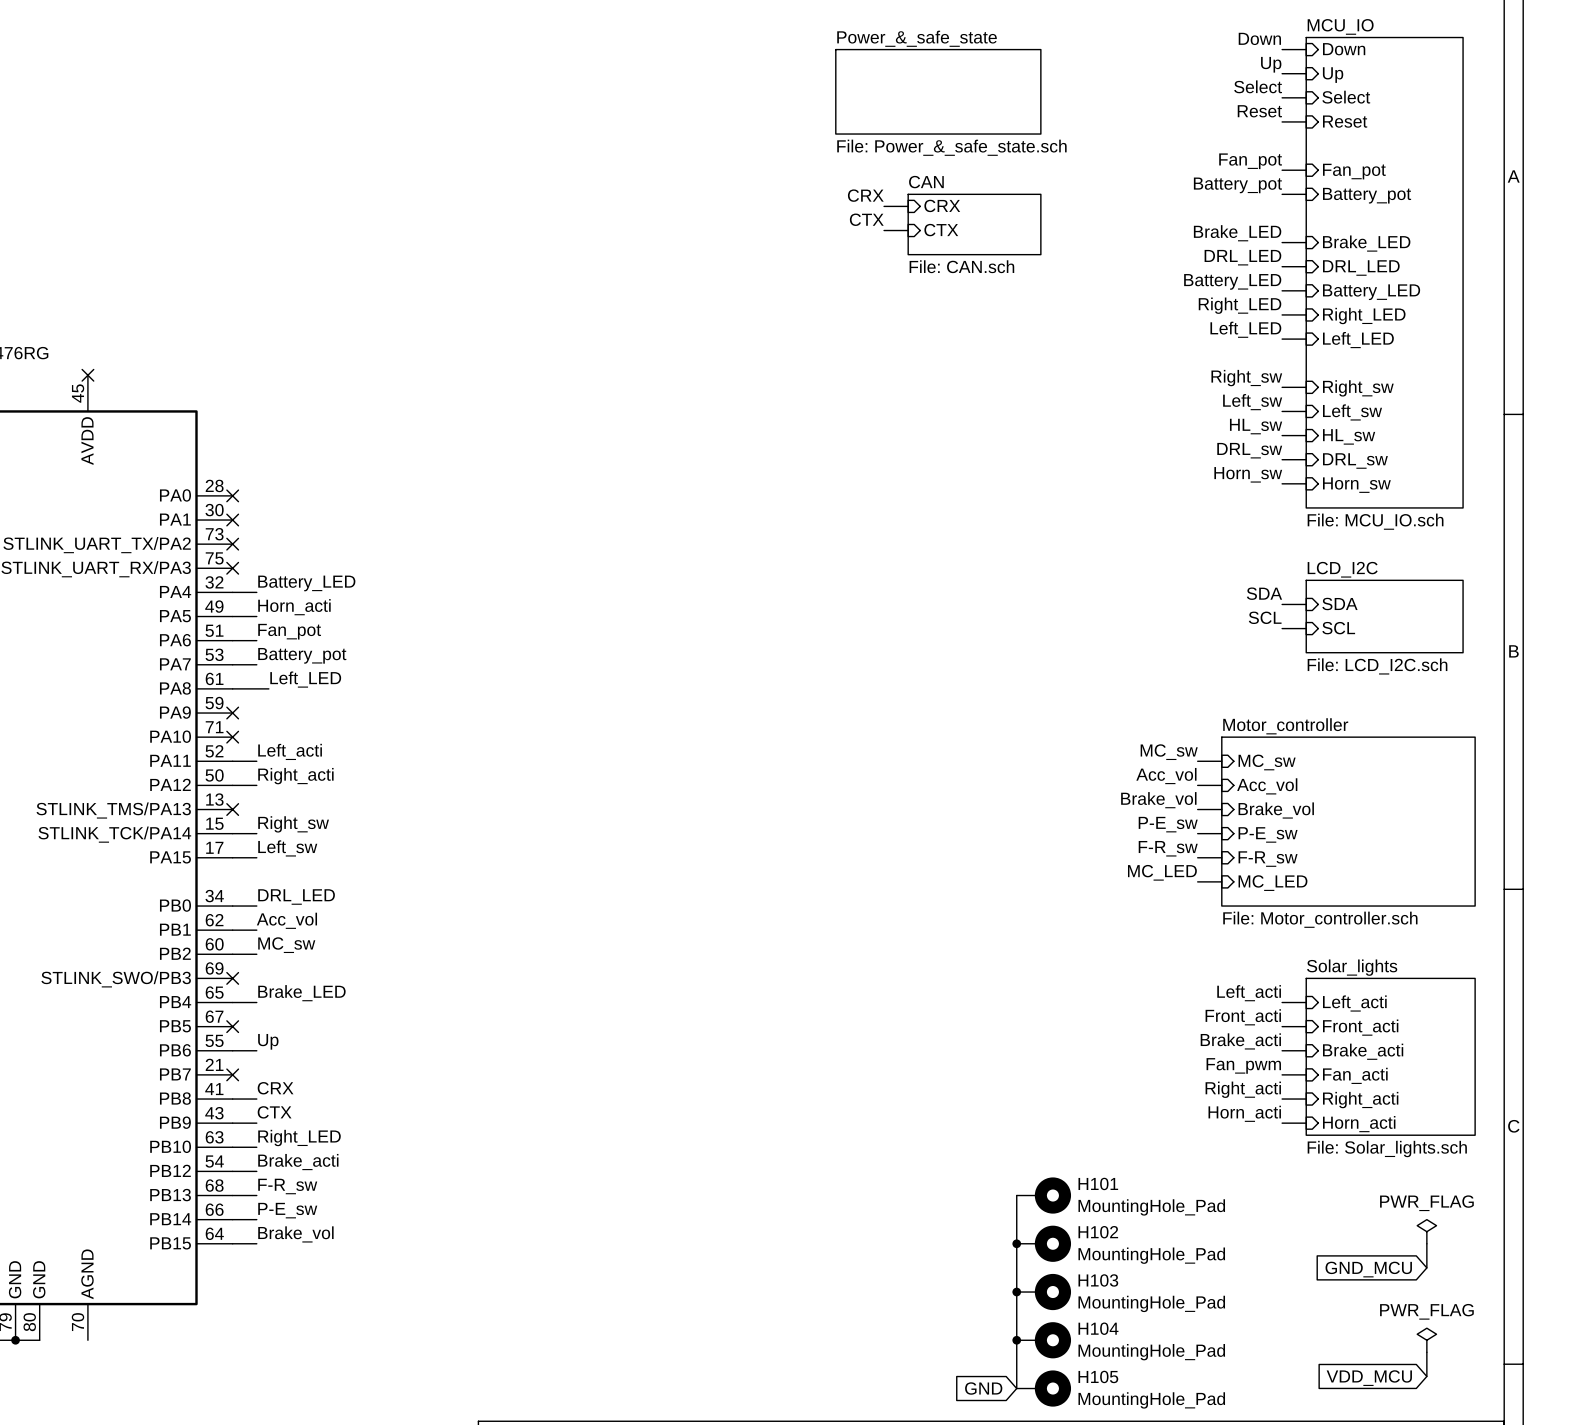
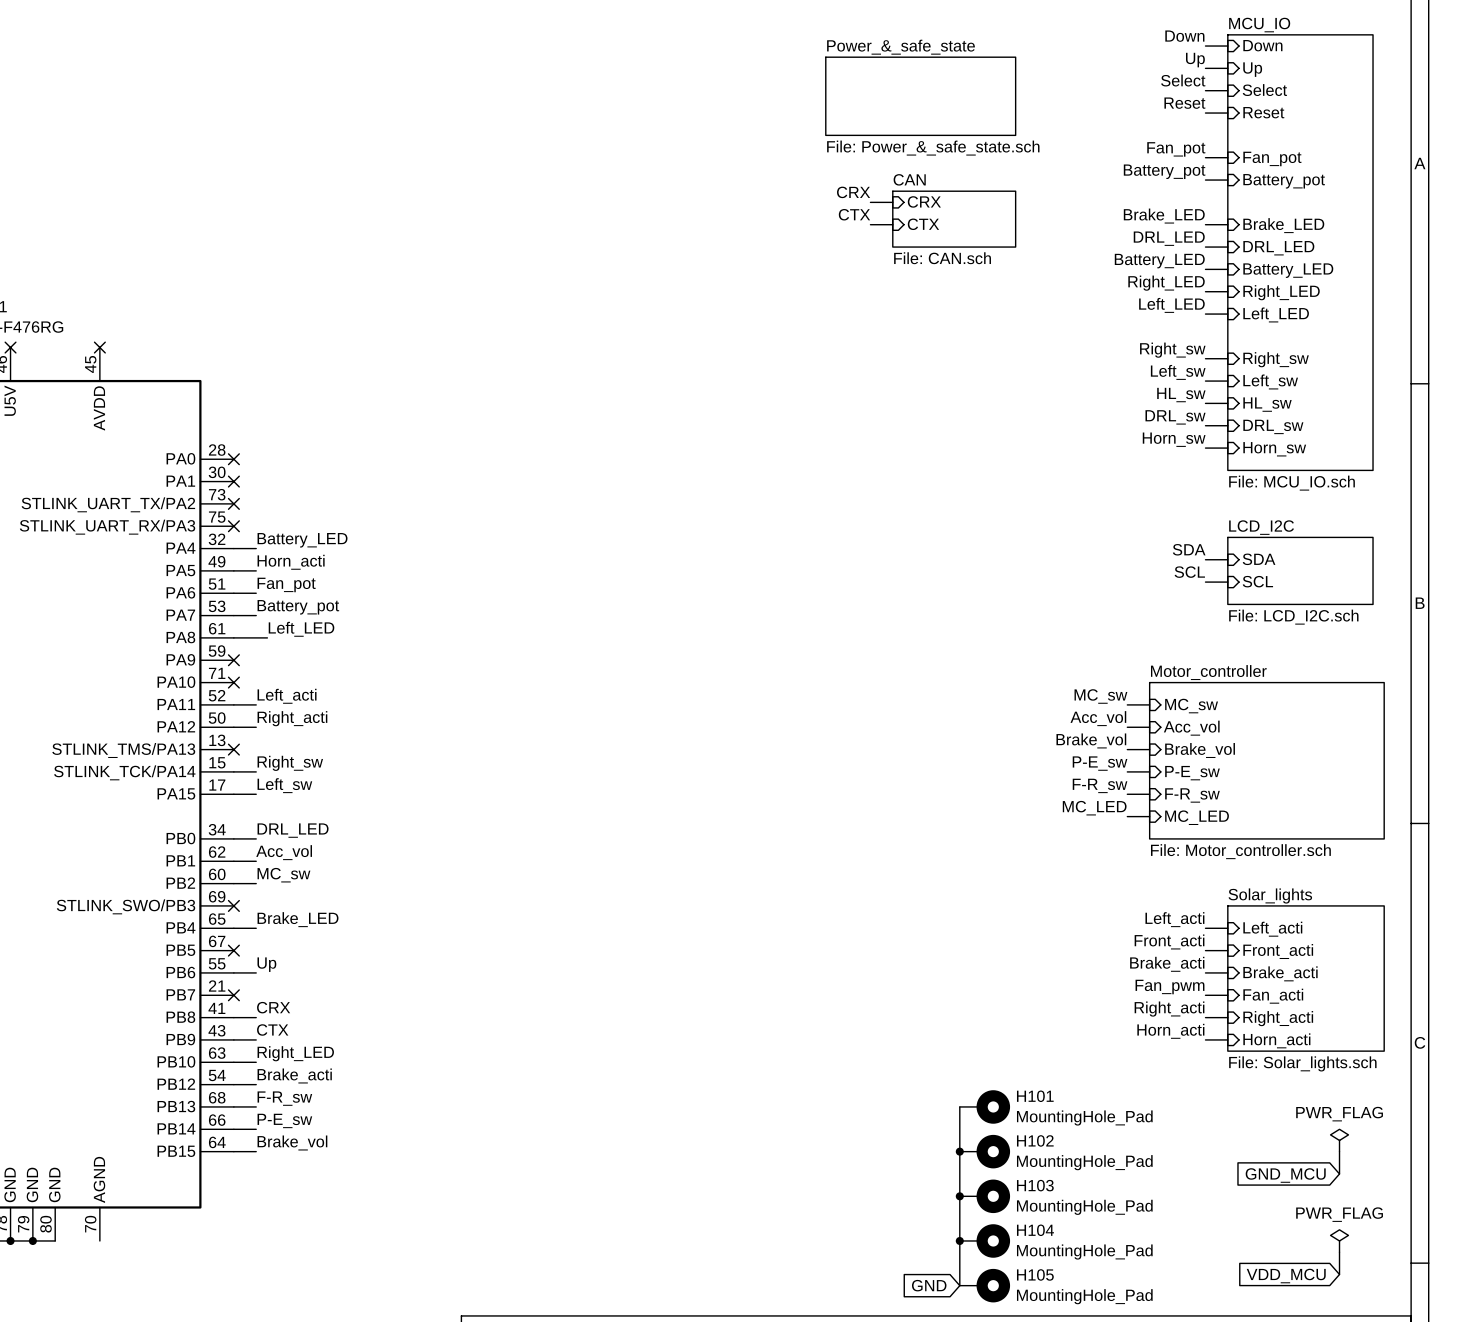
sheet Power_&_safe_state position: (938, 91) -> (920, 96)
label position: CRX (865, 195) -> CRX (853, 192)
sheet pin position: CRX (942, 205) -> CRX (924, 201)
wire: (884, 206) (908, 206) -> (870, 202) (892, 202)
label position: CTX (866, 219) -> CTX (854, 214)
sheet CAN position: (974, 224) -> (954, 219)
wire: (884, 230) (908, 230) -> (870, 224) (892, 224)
sheet pin position: CTX (941, 230) -> CTX (923, 224)

